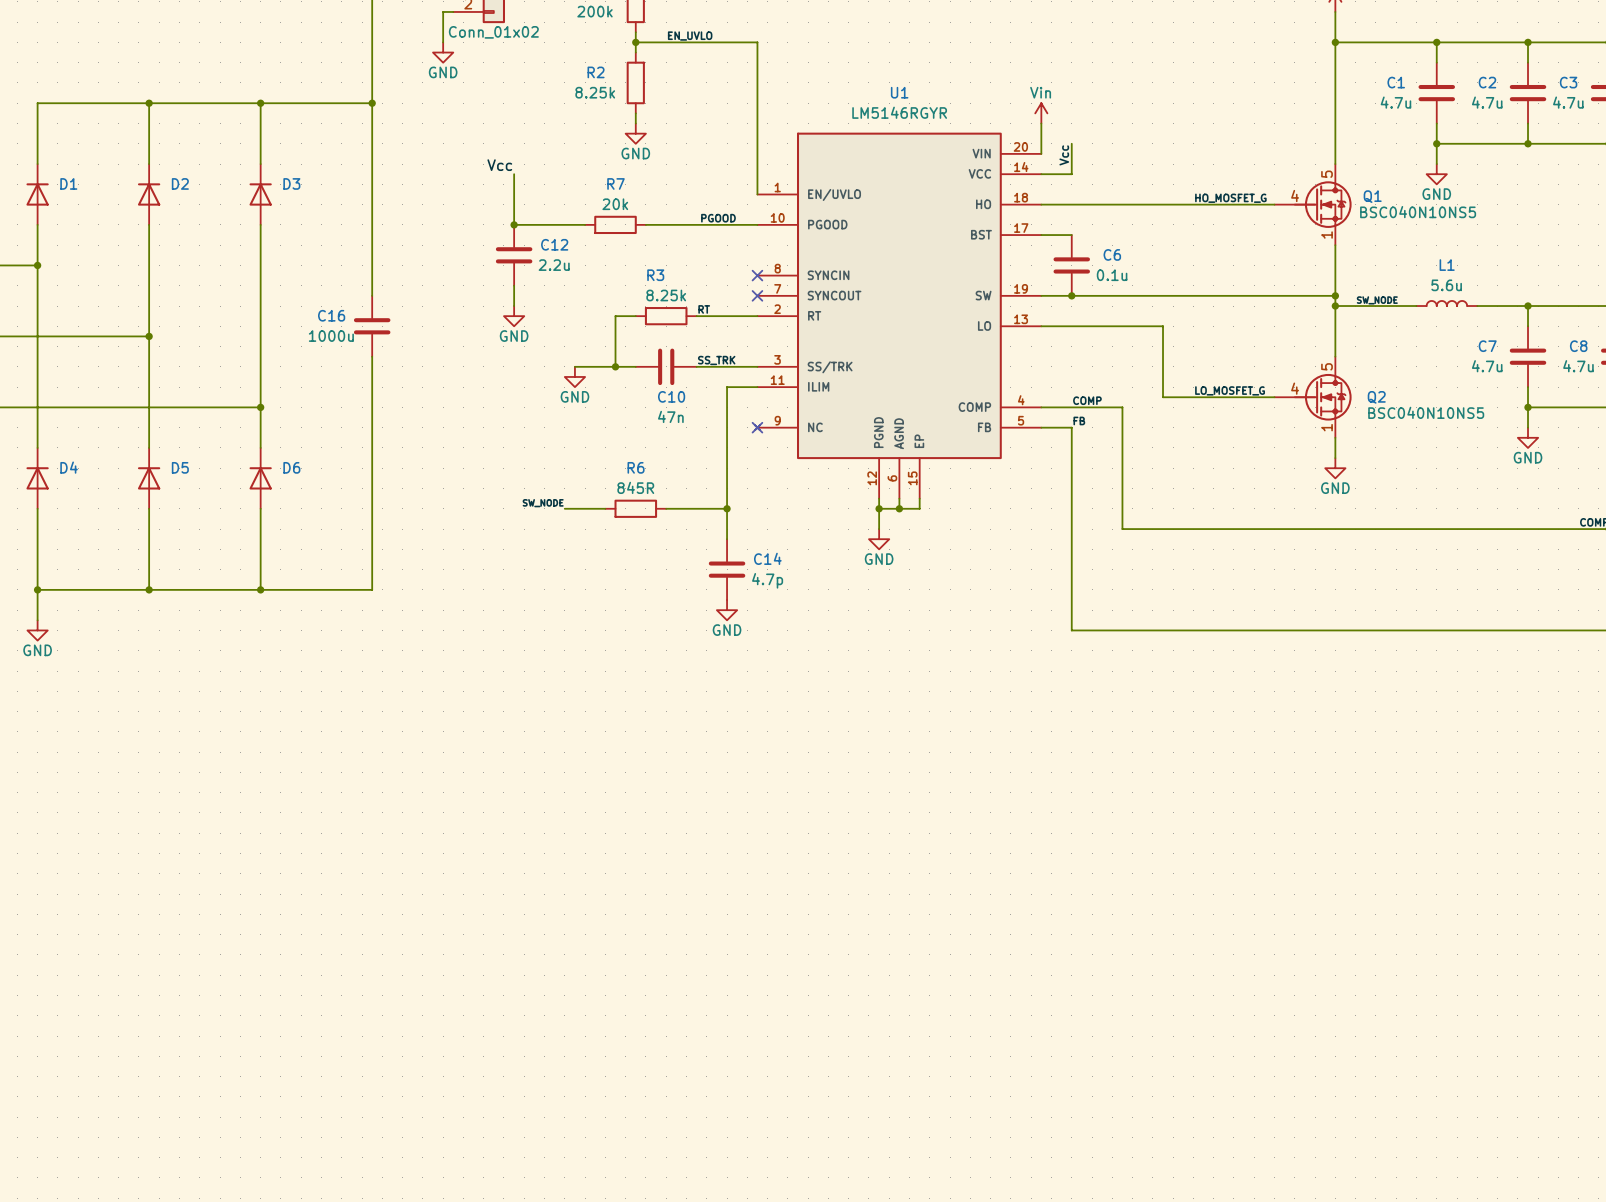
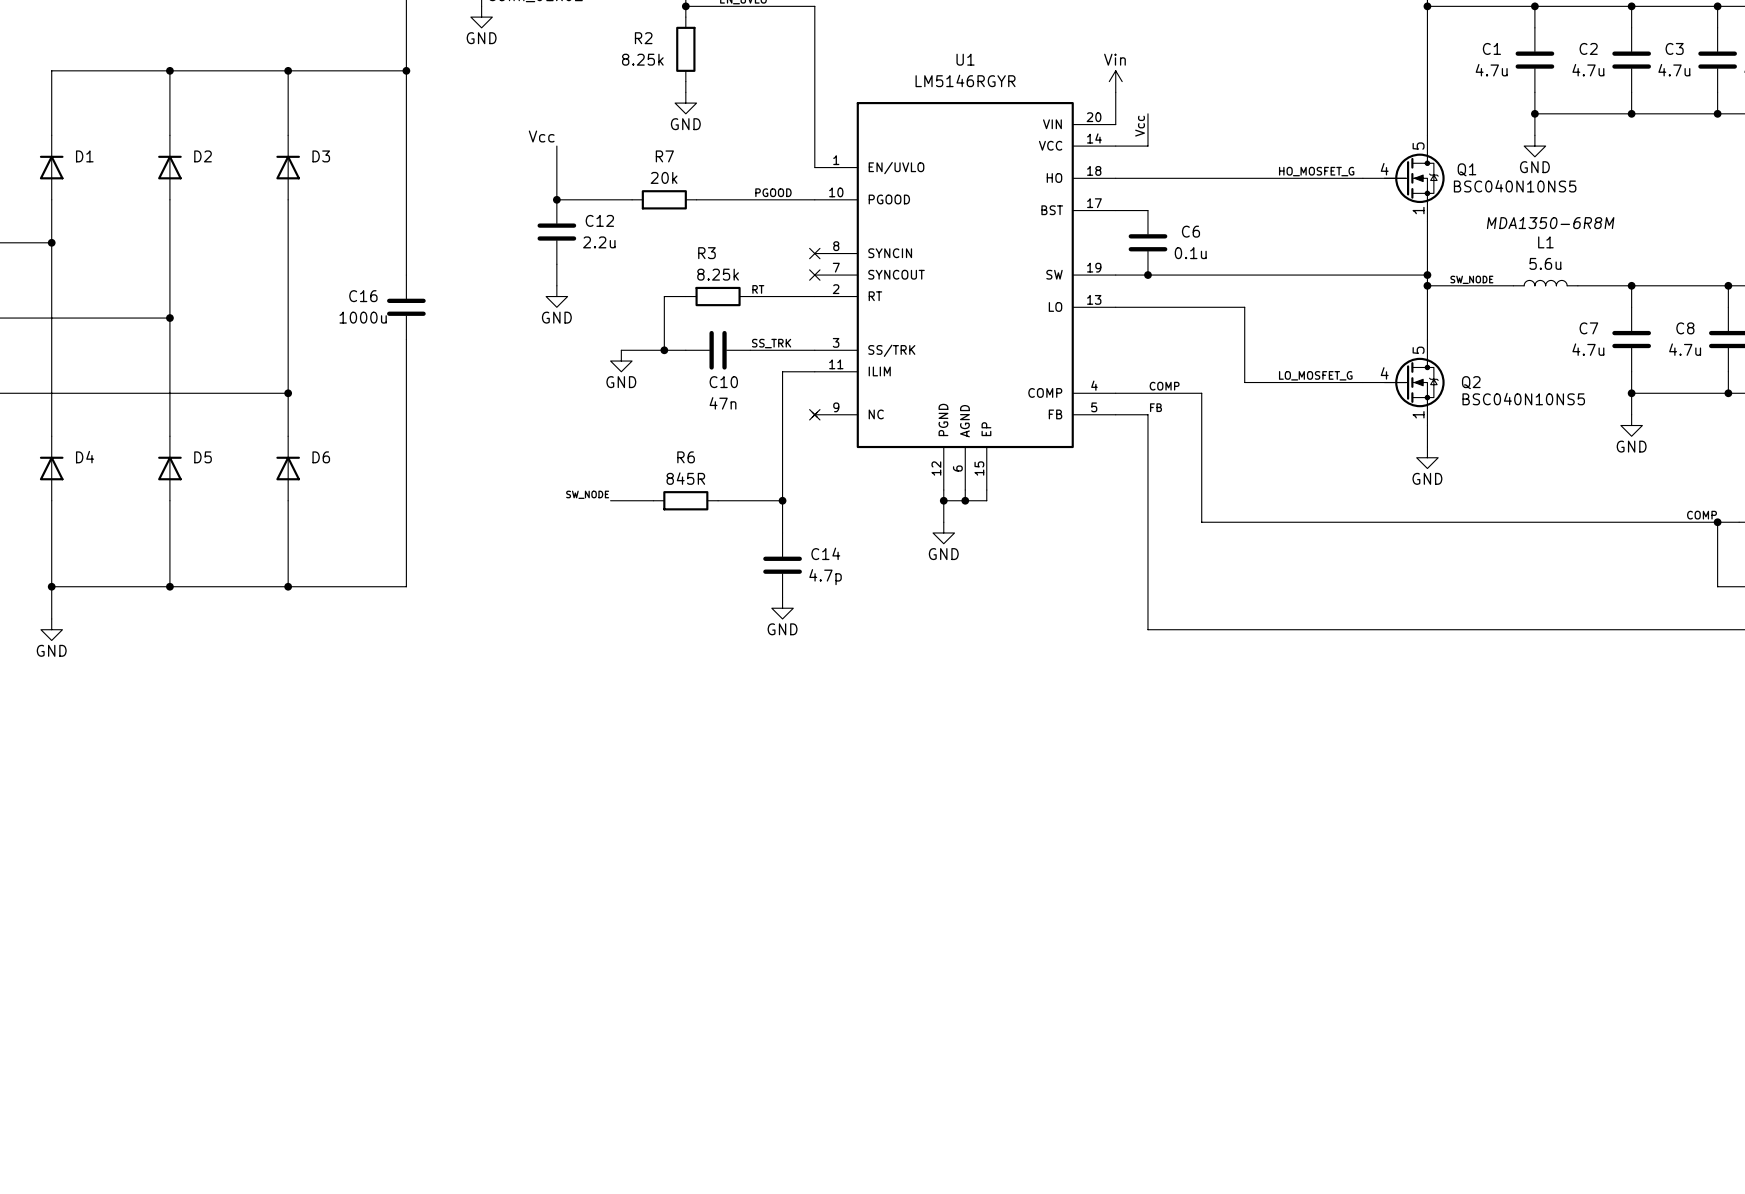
text: none -> MDA1350-6R8M (1550, 223)

